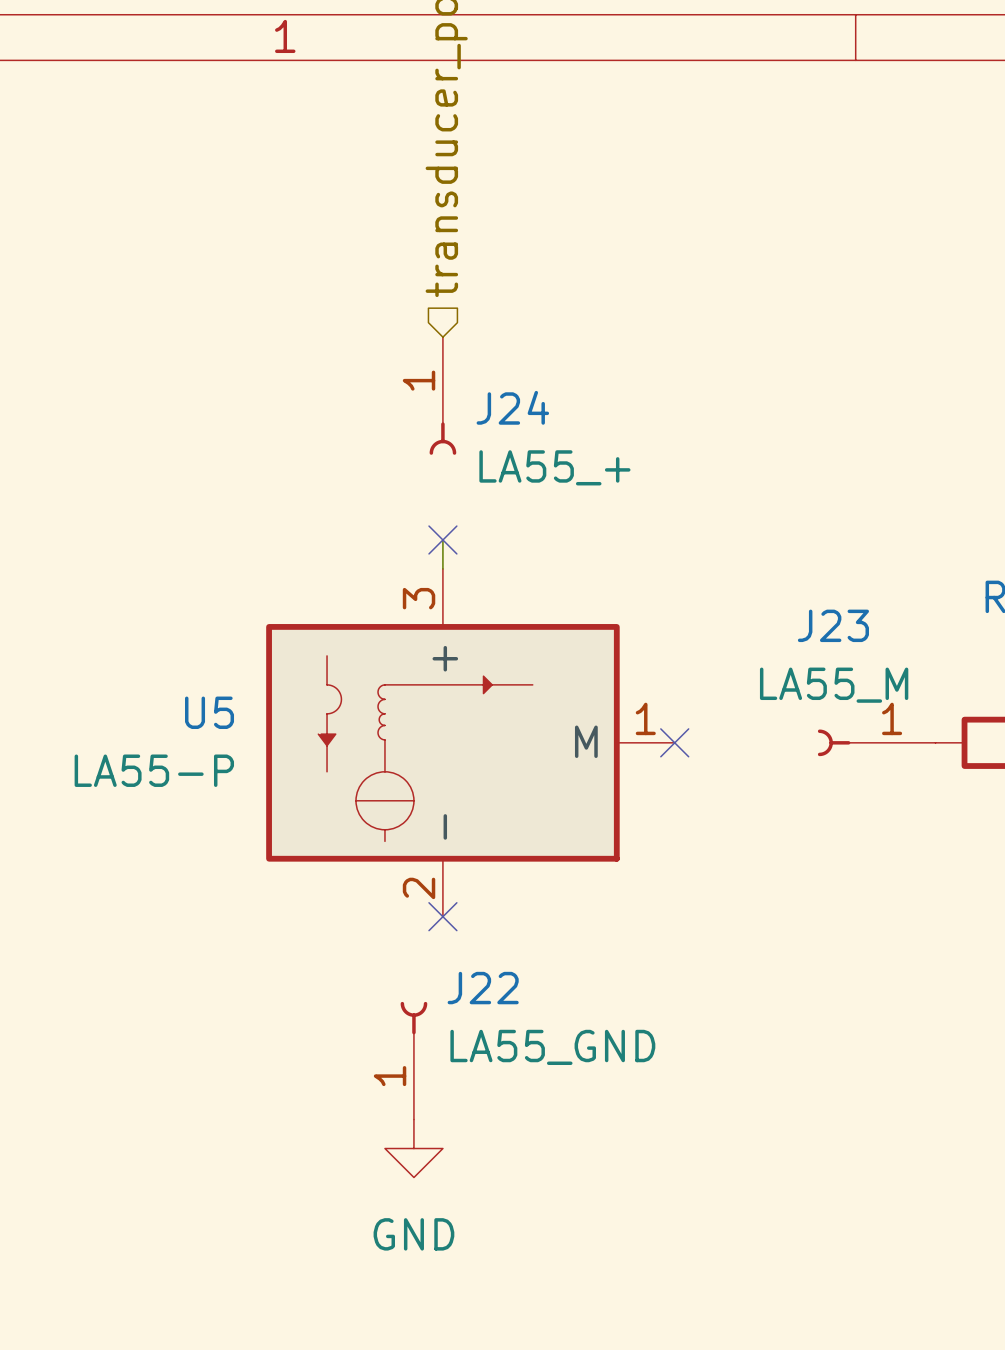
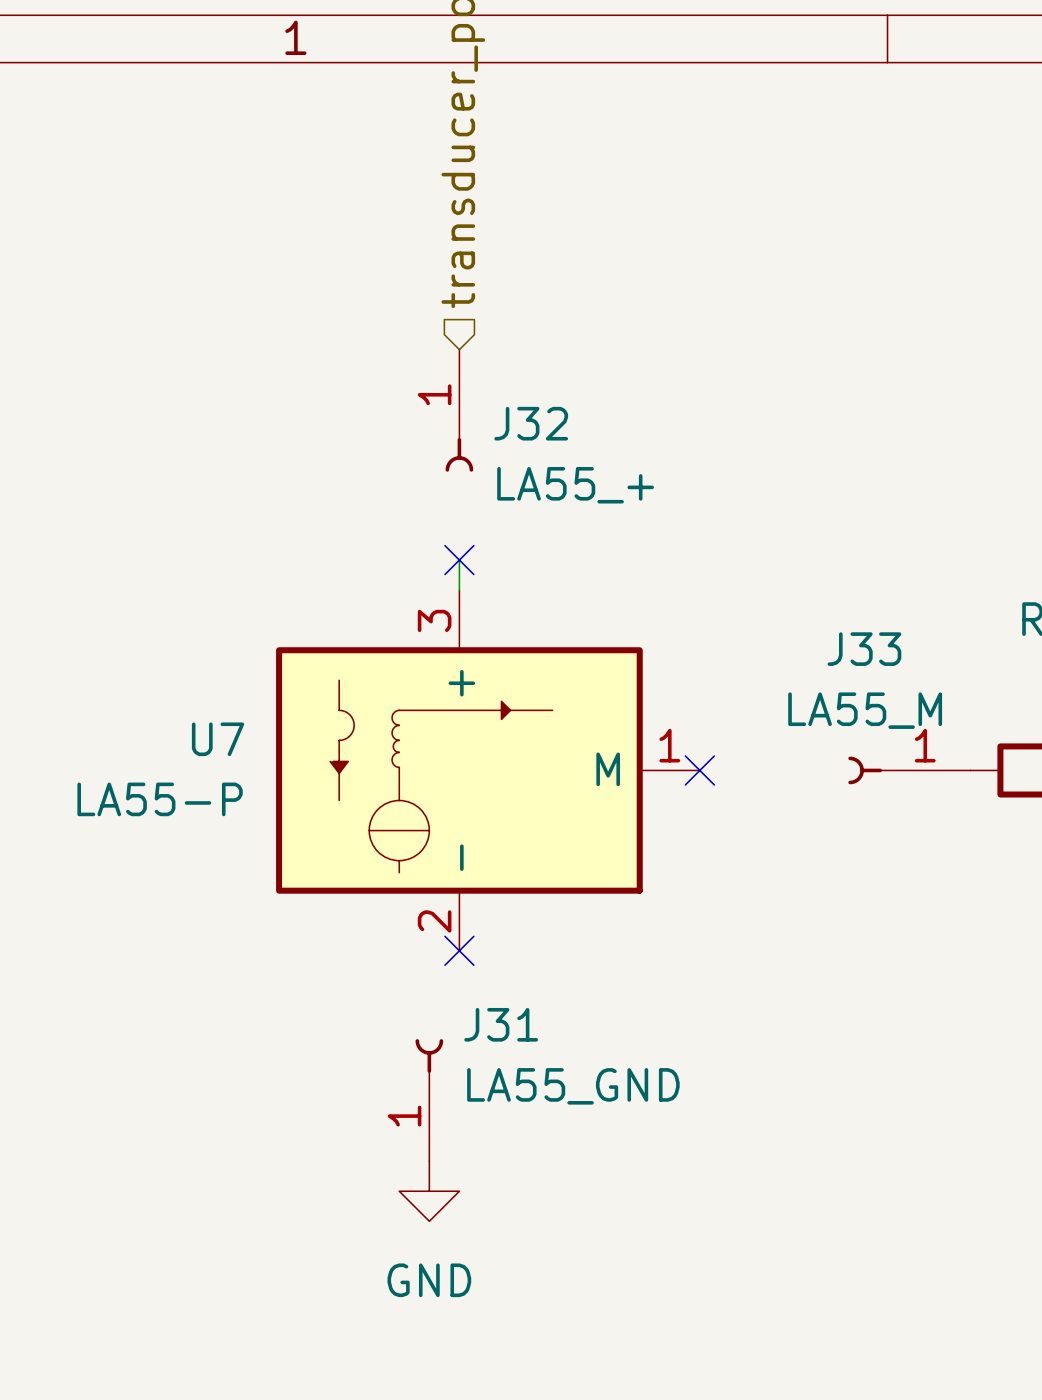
J24 name: J24 (512, 407) -> J32 (531, 423)
J23 name: J23 (833, 625) -> J33 (864, 649)
U5 name: U5 (209, 712) -> U7 (218, 739)
J22 name: J22 (483, 988) -> J31 (501, 1024)

